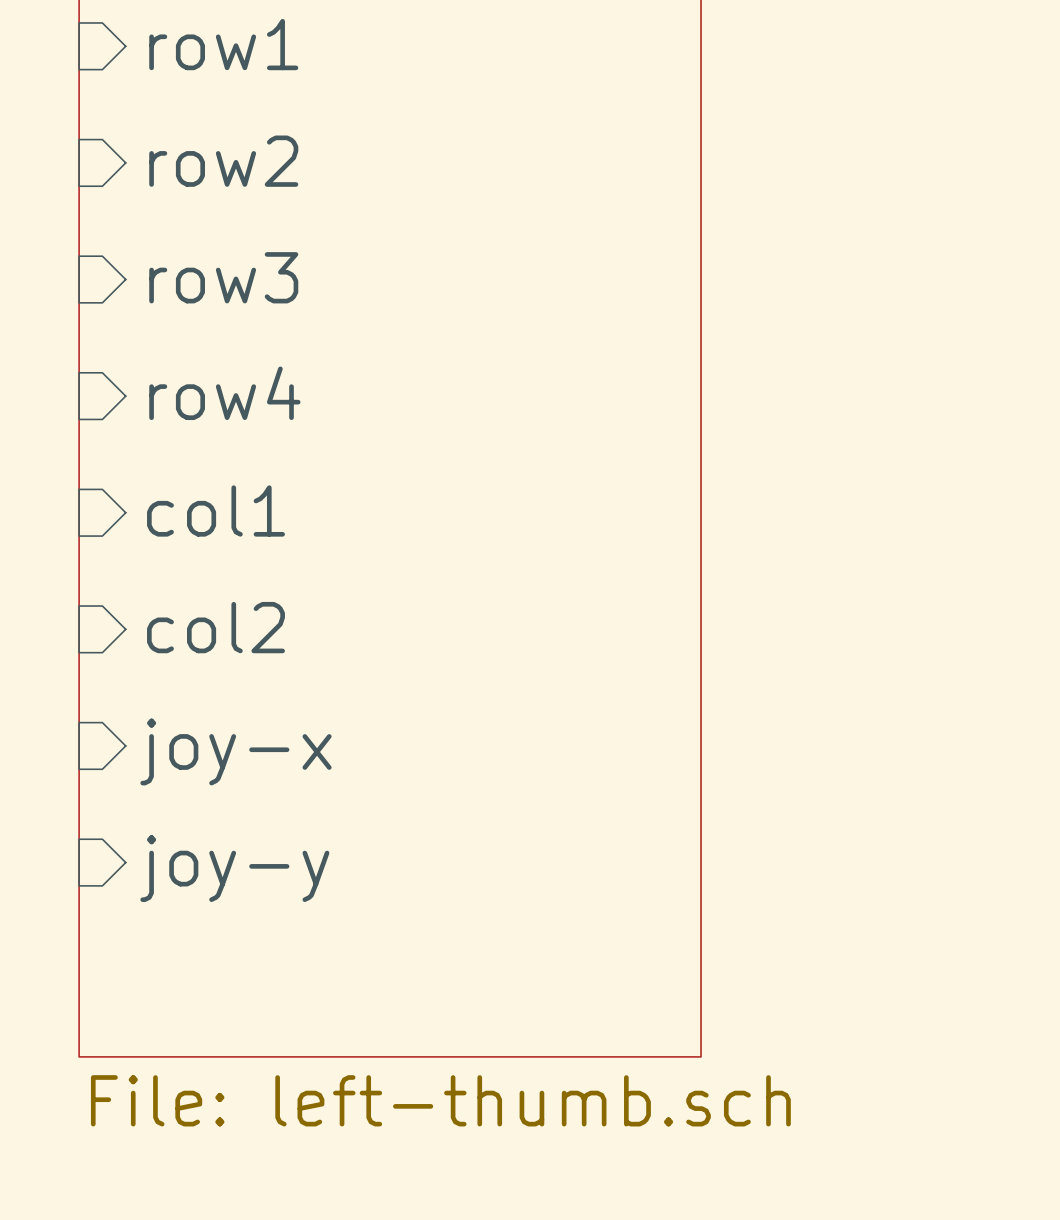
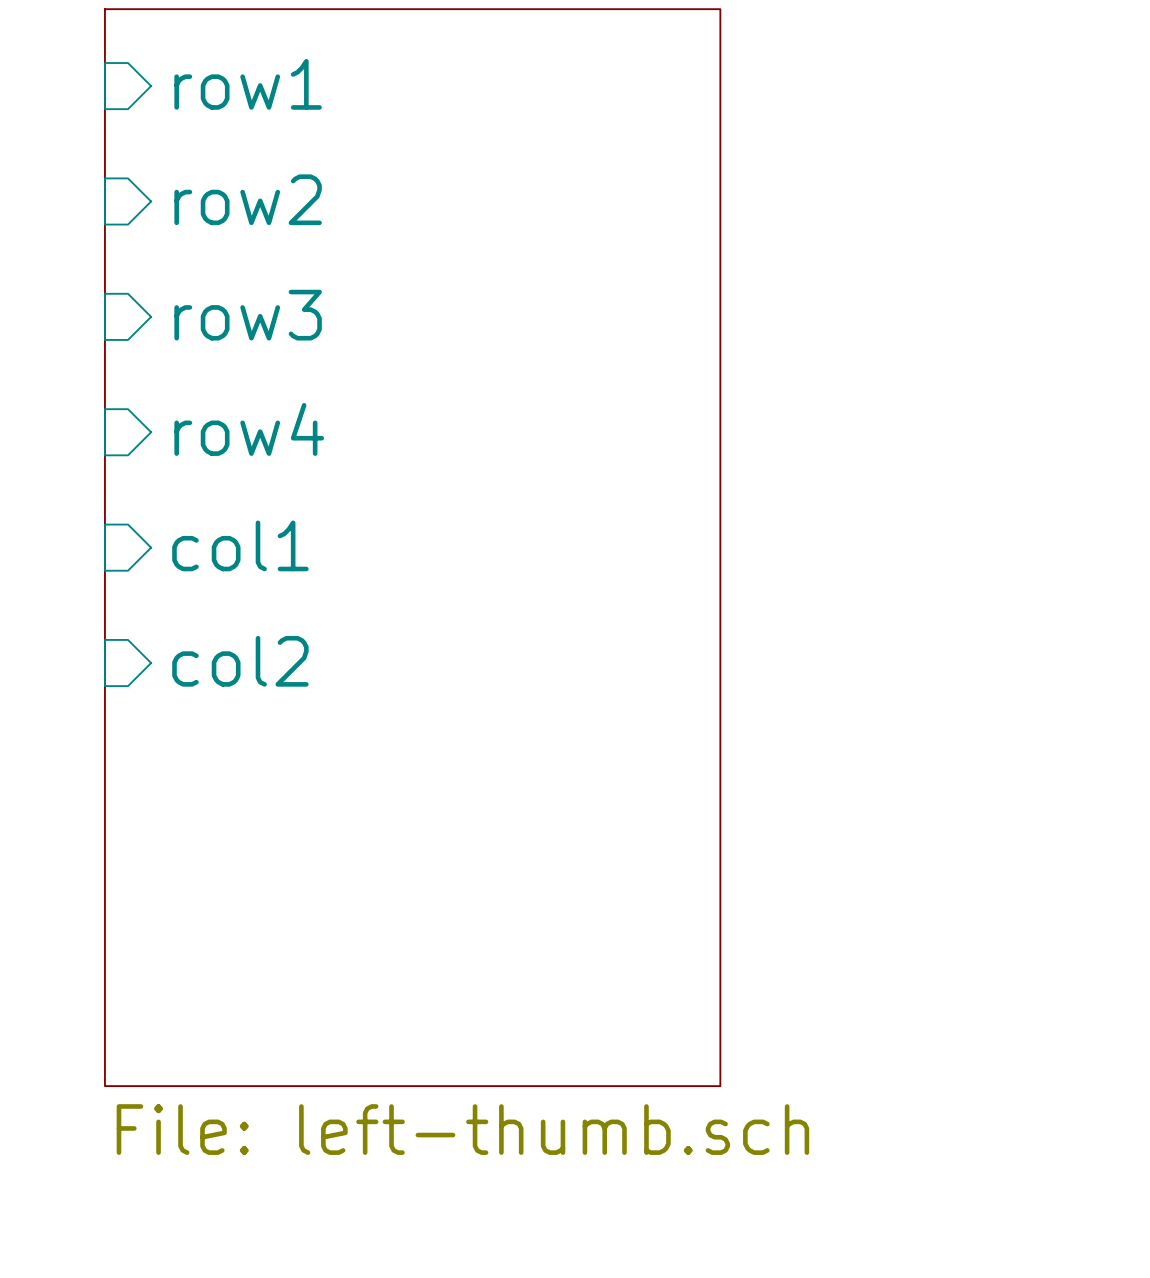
sheet pin: joy-x (235, 751) -> none
sheet pin: joy-y (234, 868) -> none

